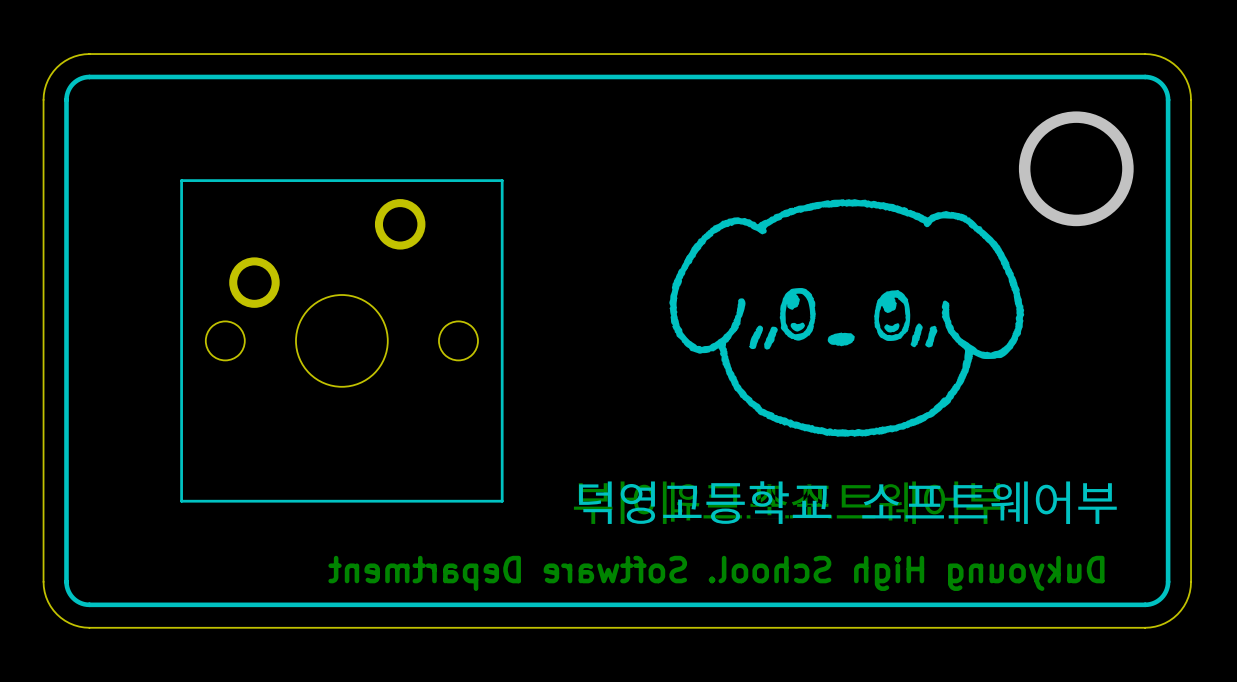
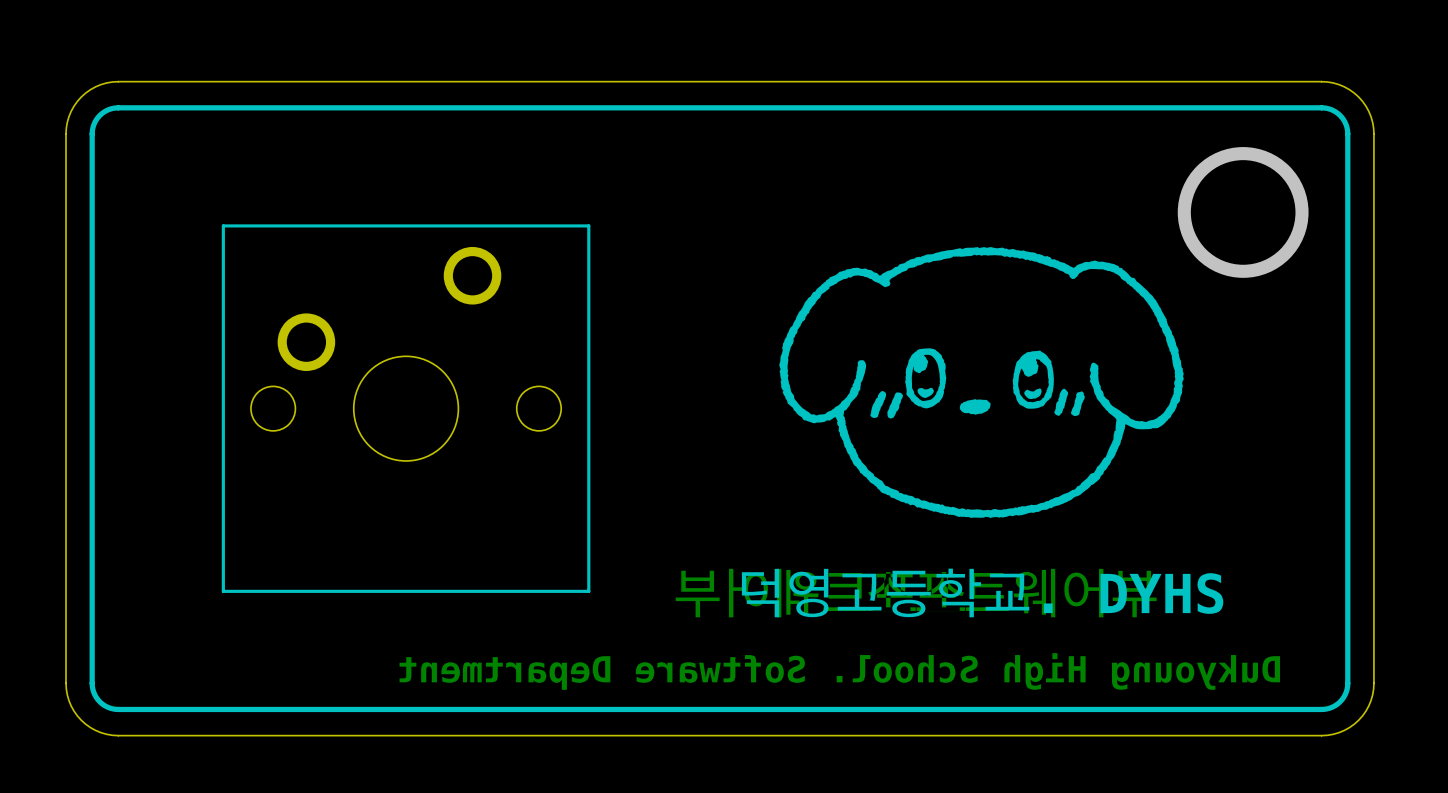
text: 덕영고등학교 소프트웨어부 (847, 502) -> 덕영고등학교. DYHS (982, 592)

